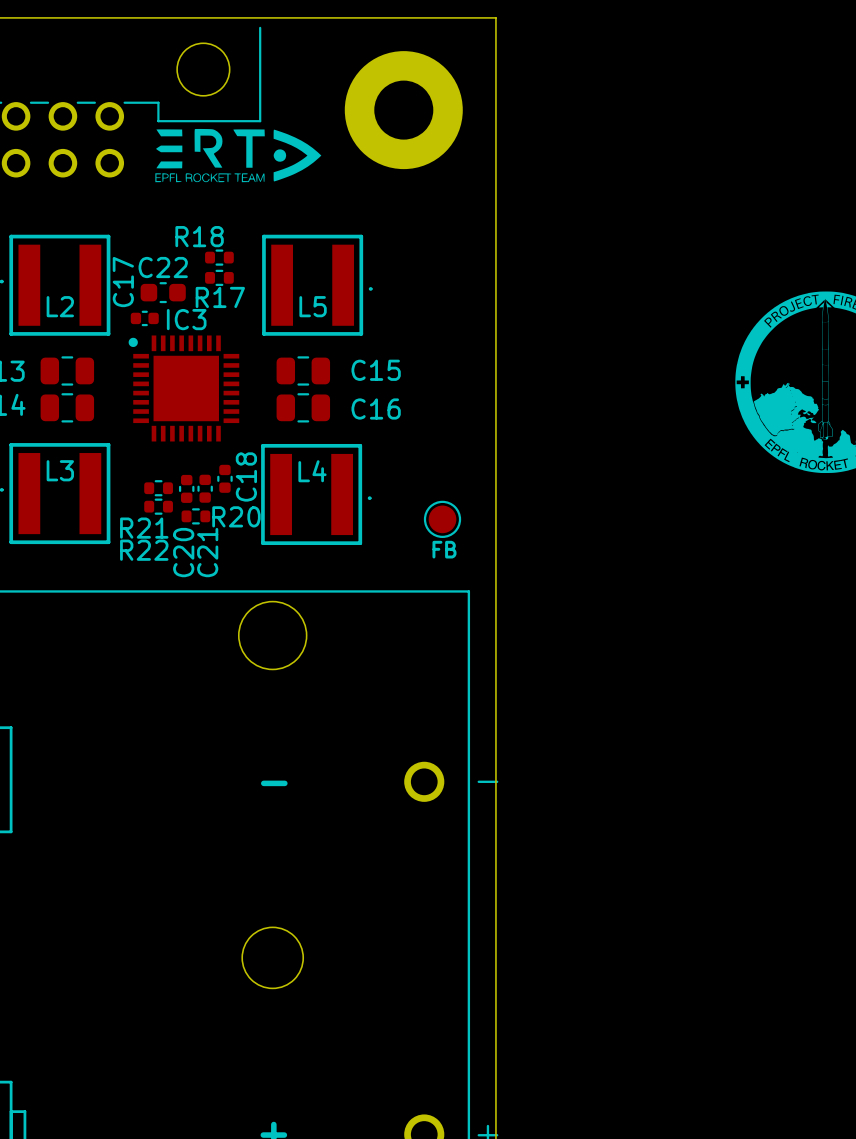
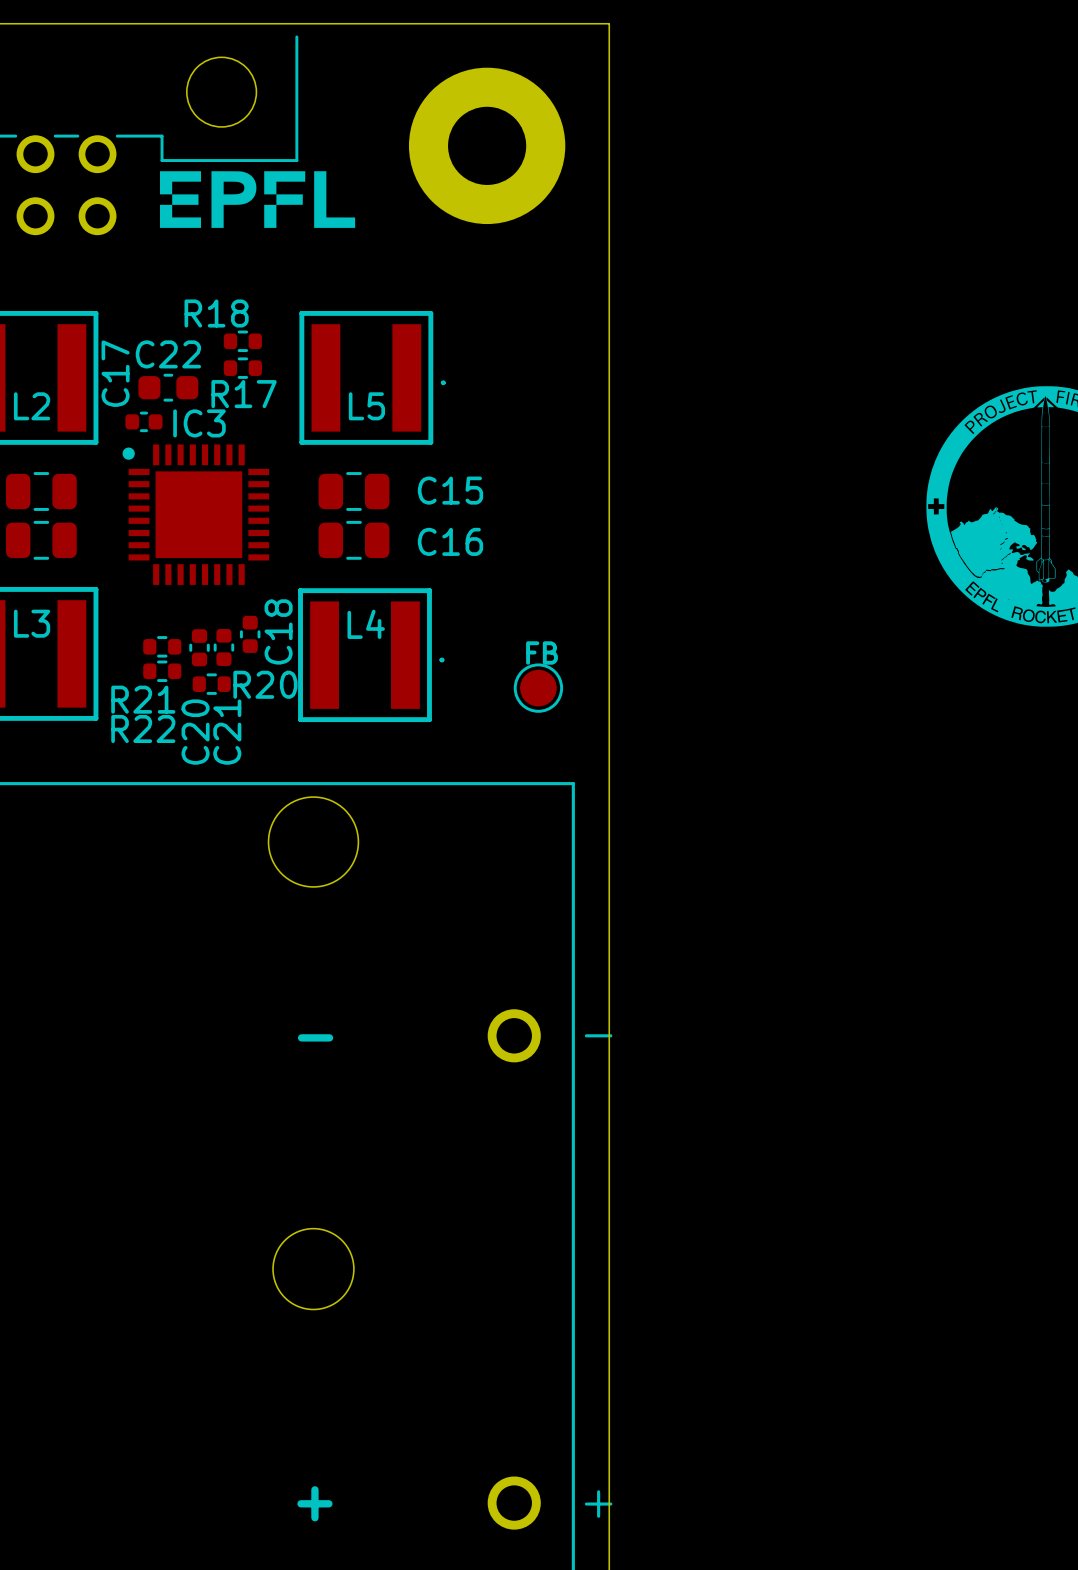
drawing shape: [155, 128, 322, 183] -> [159, 171, 356, 228]
text position: FB (444, 549) -> FB (542, 652)

